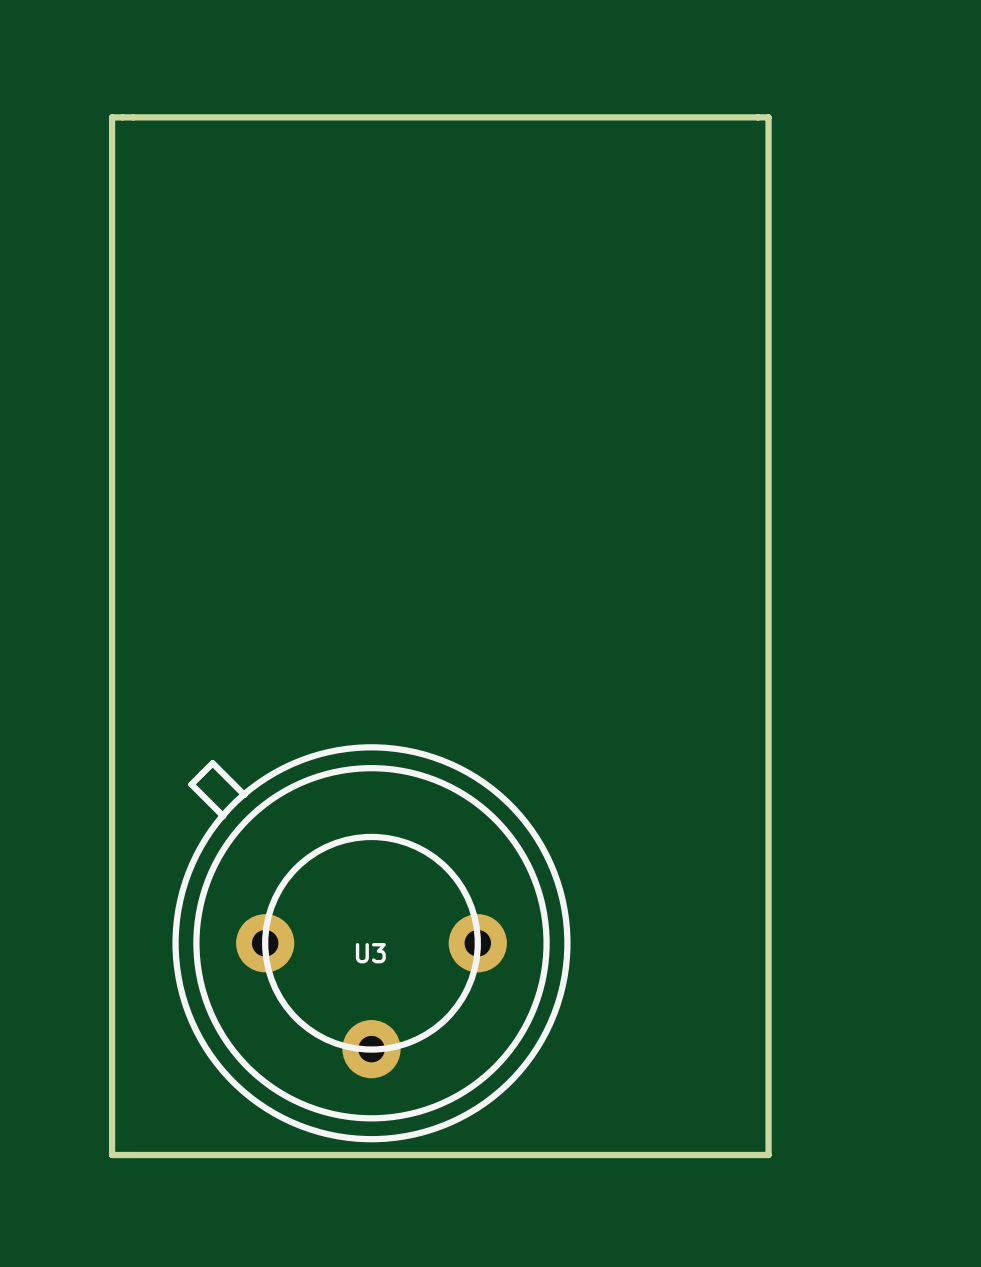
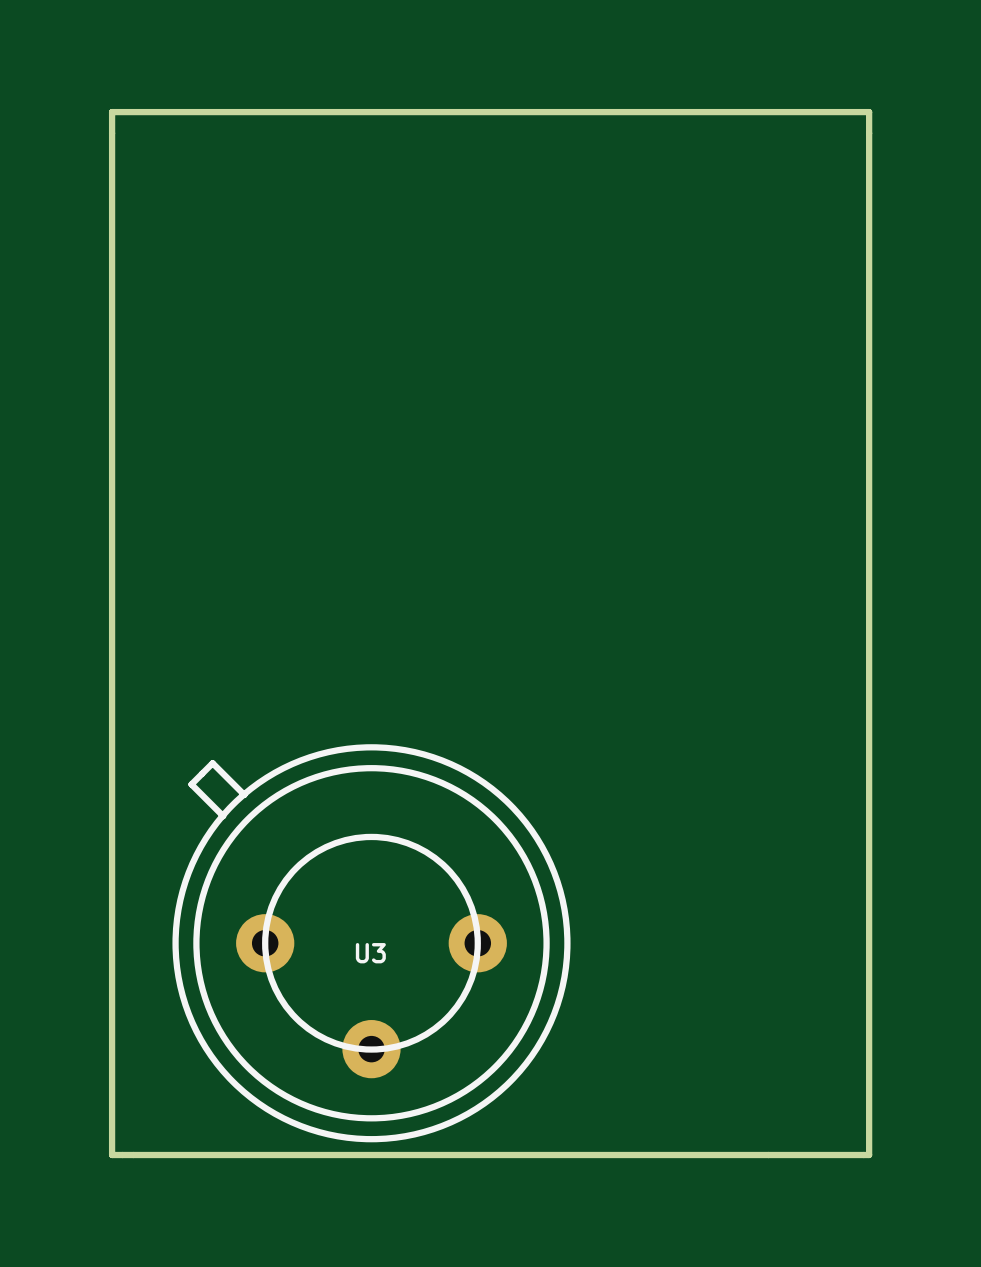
board edge: (112, 117) (768, 117) (768, 1155) -> (112, 117) (112, 112) (869, 112) (869, 1155) (768, 1155)

